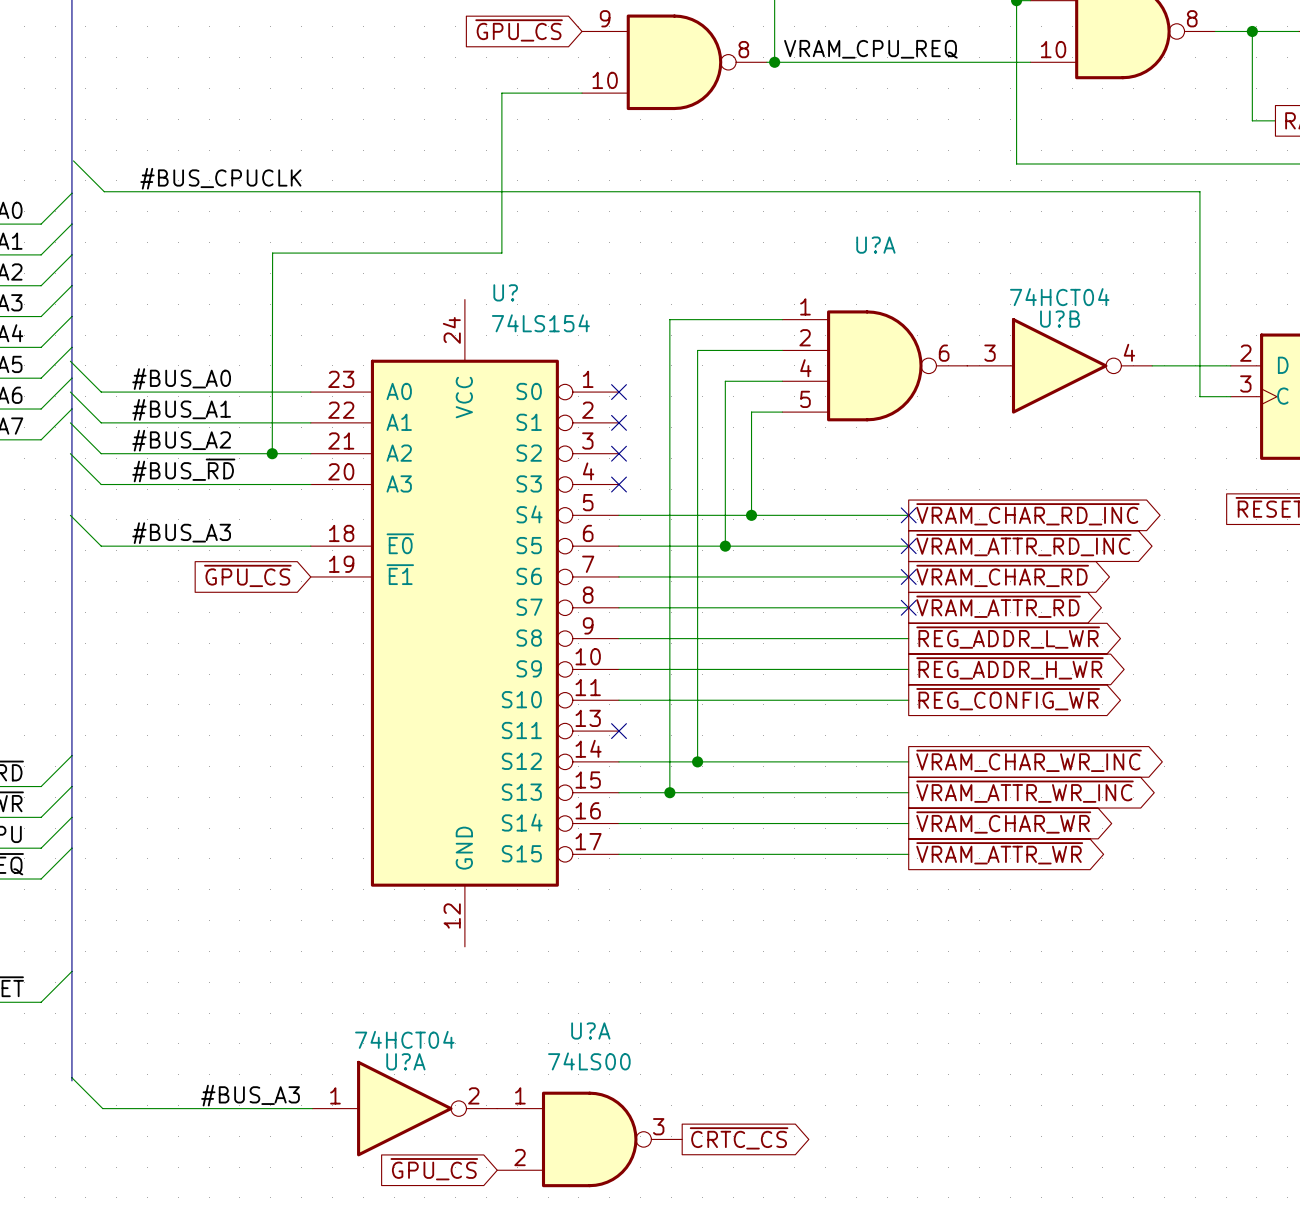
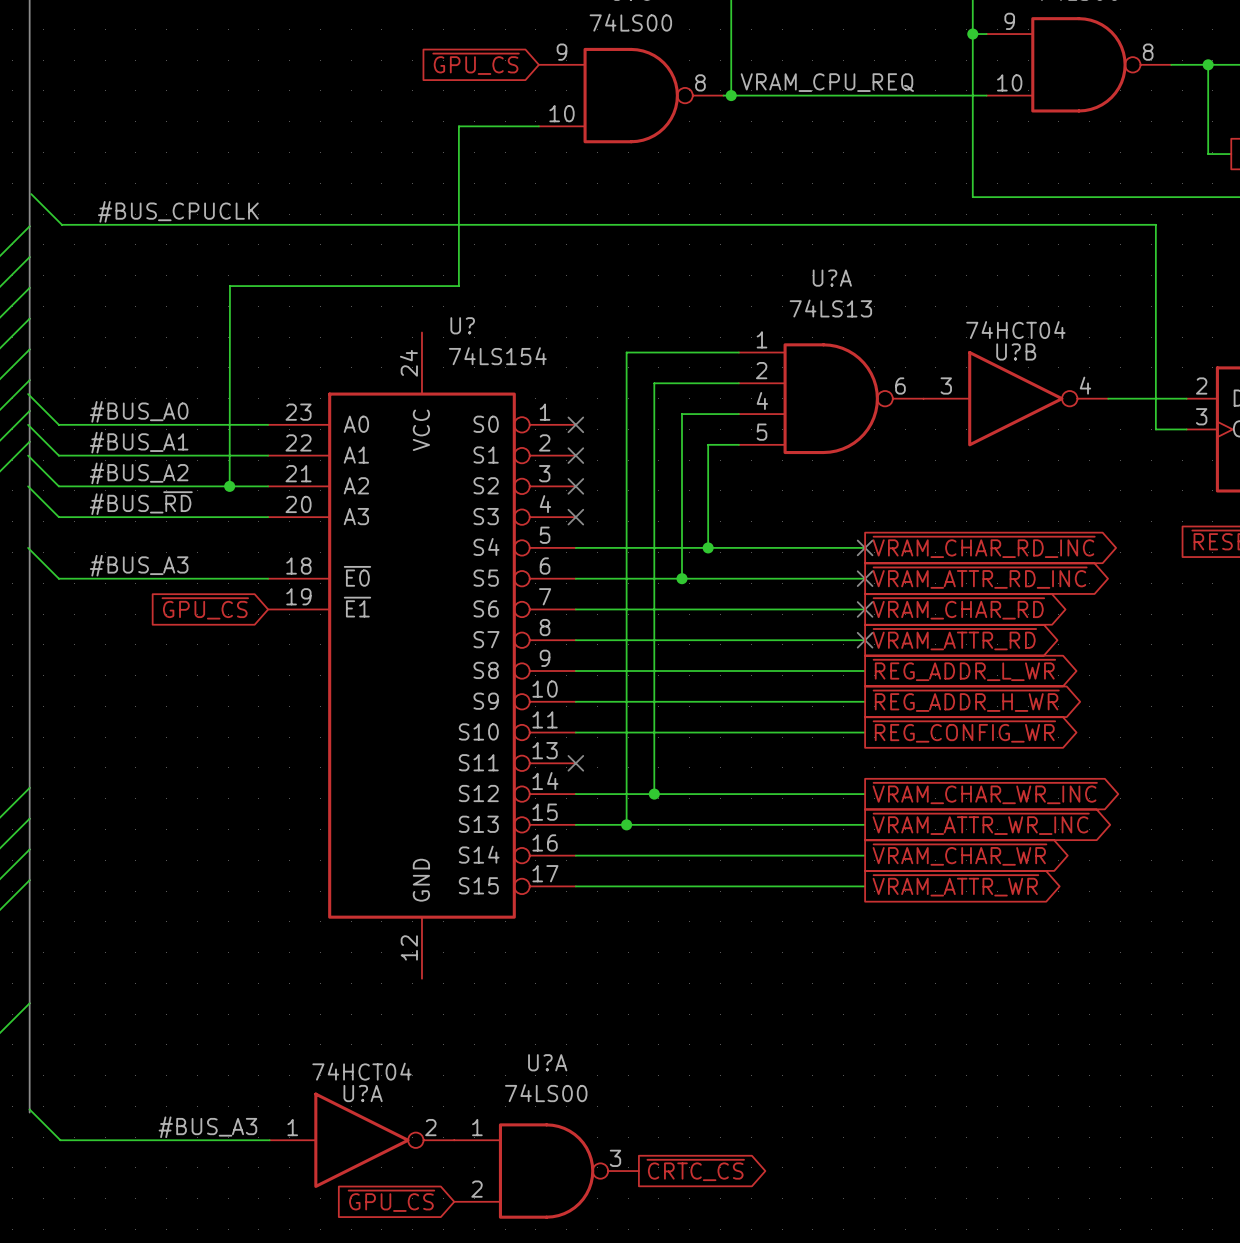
U?A value: none -> 74LS13 (830, 308)

